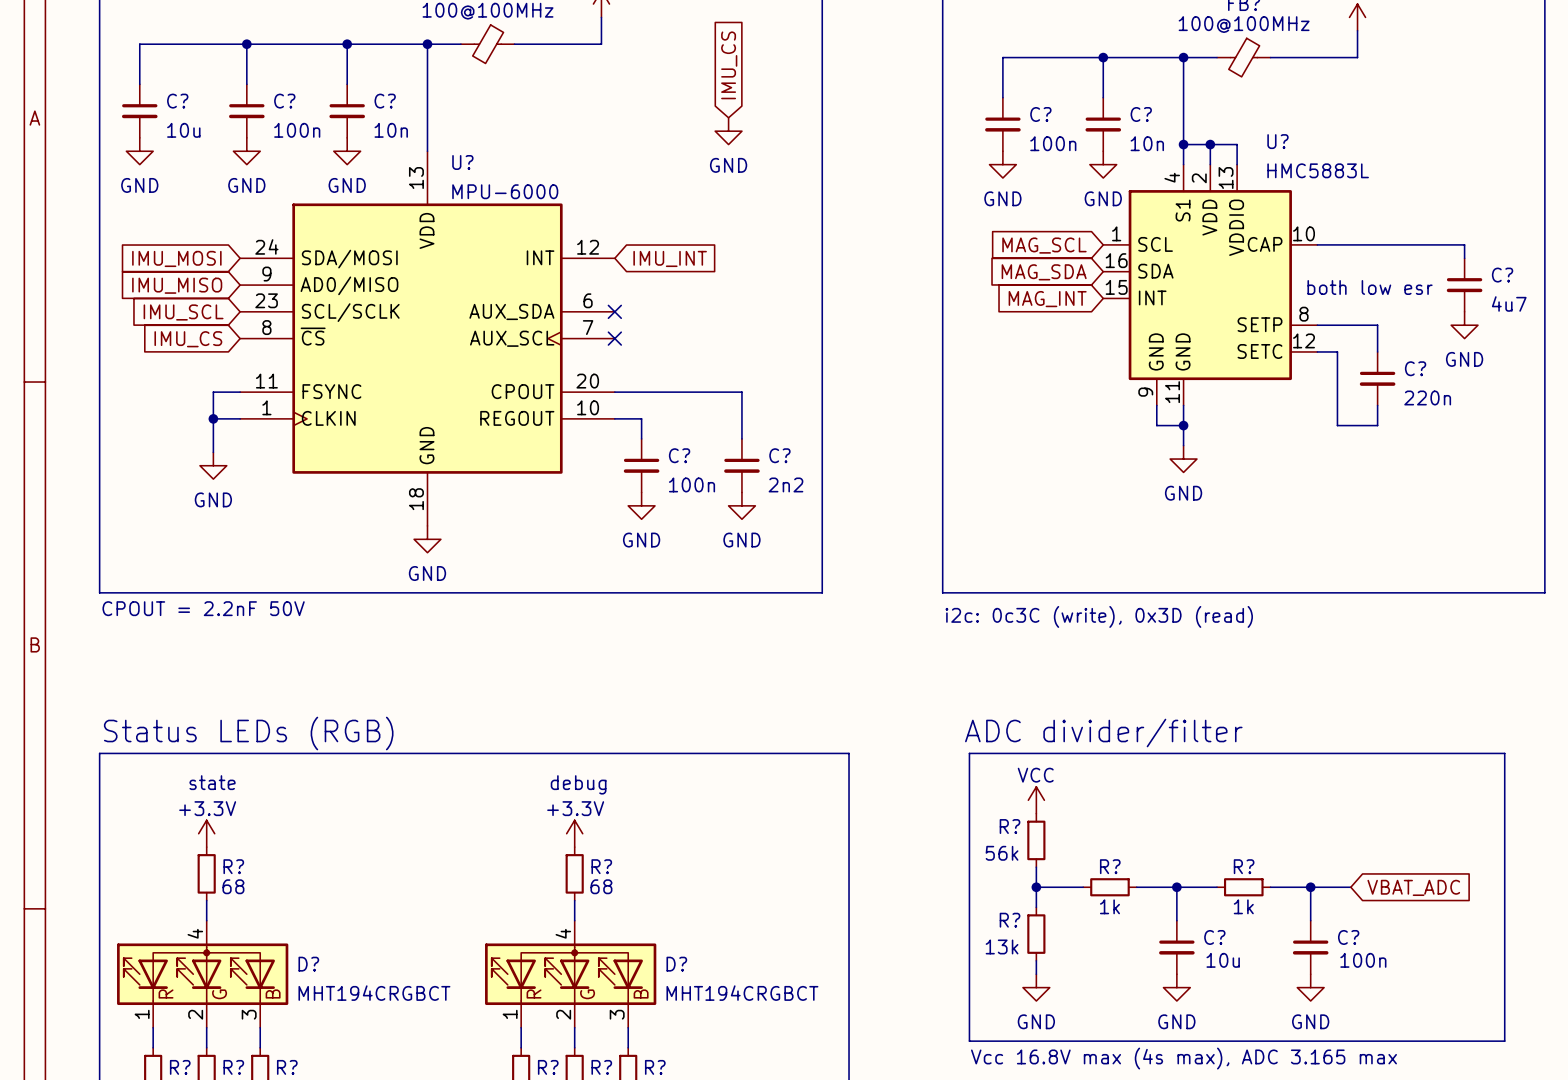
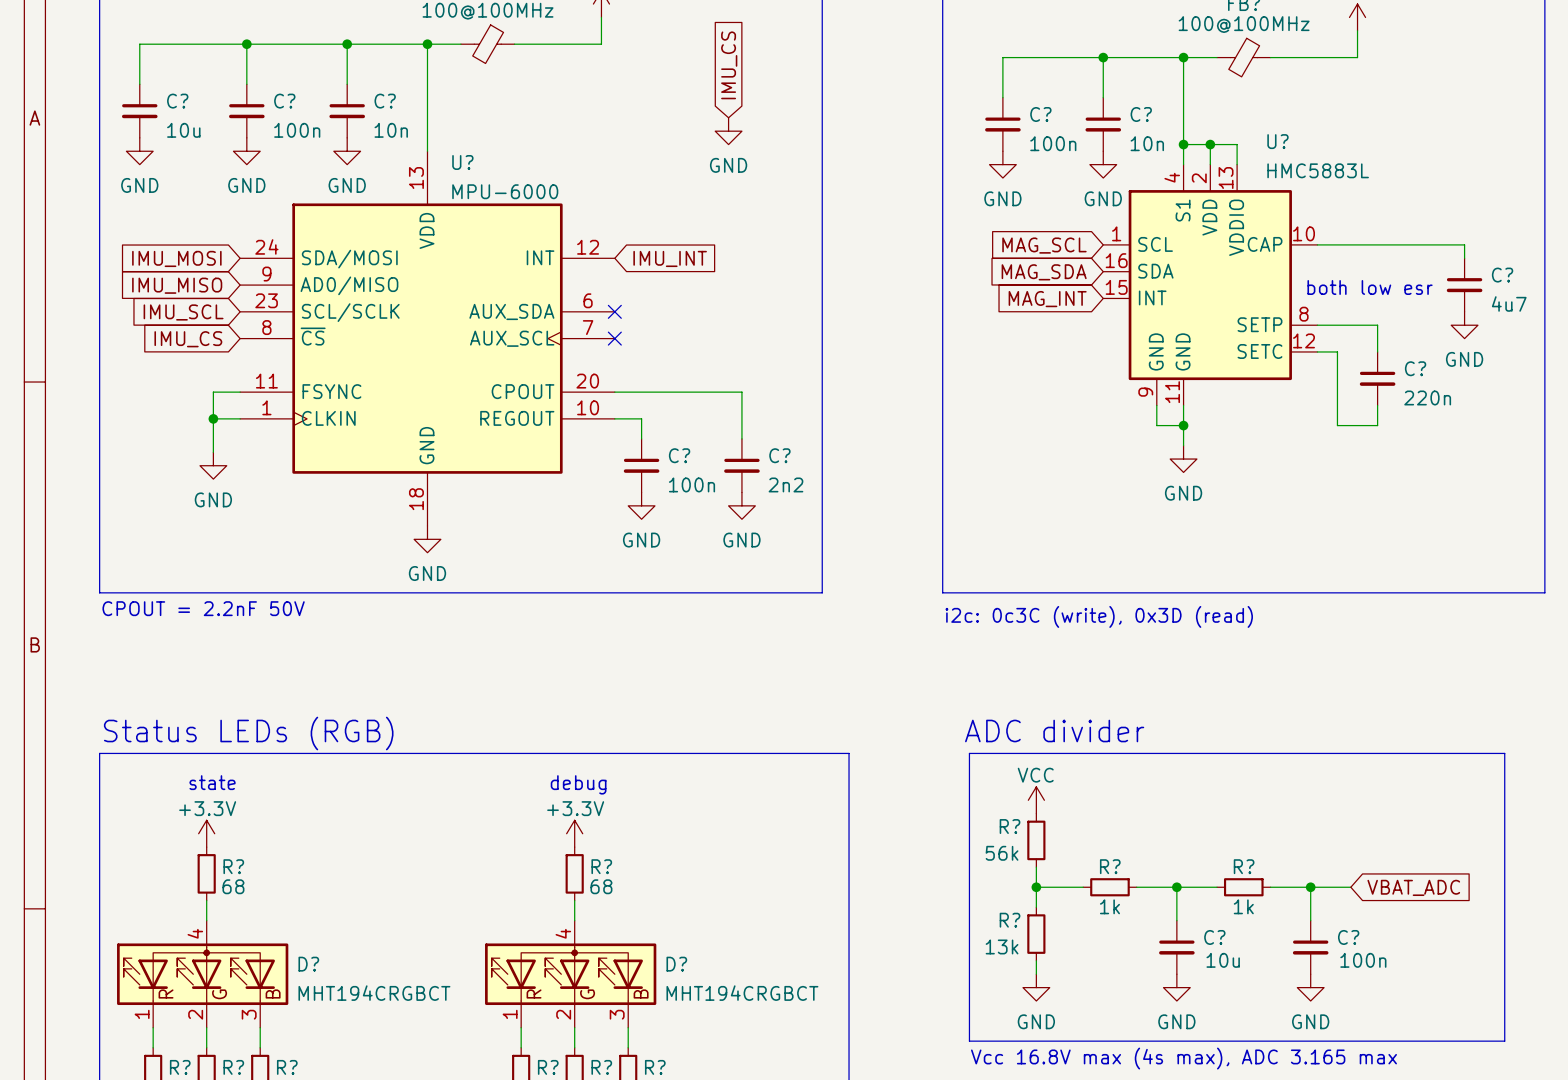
text: ADC divider/filter (1103, 733) -> ADC divider (1054, 730)

